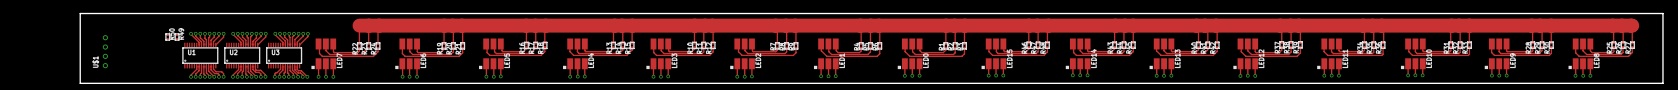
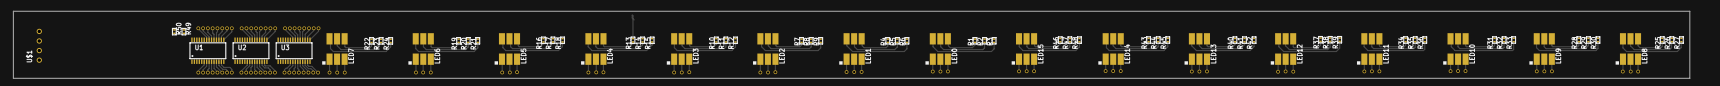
board edge: (80, 13) (80, 83) (1662, 83) (1662, 13) (80, 13) -> (13, 11) (13, 78) (1689, 78) (1689, 11) (13, 11)
track: (368, 25) (368, 44) -> none
track: (379, 25) (378, 44) -> none
track: (444, 25) (444, 44) -> none
track: (452, 25) (453, 44) -> none
track: (461, 25) (462, 44) -> none
track: (526, 25) (526, 43) -> none
track: (535, 25) (535, 43) -> none
track: (545, 25) (545, 43) -> none
track: (622, 25) (622, 43) -> none
track: (632, 25) (632, 43) -> none
track: (694, 25) (694, 43) -> none
track: (704, 25) (703, 43) -> none
track: (712, 25) (713, 43) -> none
track: (775, 25) (777, 44) -> none
track: (785, 25) (786, 44) -> none
track: (795, 25) (795, 44) -> none
track: (860, 25) (861, 44) -> none
track: (870, 25) (870, 44) -> none
track: (879, 25) (879, 44) -> none
track: (946, 25) (945, 44) -> none
track: (954, 25) (955, 44) -> none
track: (964, 25) (964, 44) -> none
track: (1028, 25) (1028, 43) -> none
track: (1037, 25) (1038, 43) -> none
track: (1048, 25) (1047, 43) -> none
track: (1115, 25) (1113, 23) (1113, 22) (1114, 23) (1114, 43) -> none
track: (1124, 25) (1123, 43) -> none
track: (1133, 25) (1133, 43) -> none
track: (1196, 25) (1198, 27) (1198, 43) -> none
track: (1204, 25) (1207, 28) (1207, 43) -> none
track: (1216, 25) (1217, 43) -> none
track: (1280, 25) (1281, 43) -> none
track: (1290, 25) (1291, 43) -> none
track: (1298, 25) (1300, 43) -> none
track: (1363, 25) (1364, 43) -> none
track: (1372, 25) (1373, 43) -> none
track: (1381, 25) (1383, 27) (1383, 43) -> none
track: (1451, 25) (1450, 43) -> none
track: (1459, 25) (1460, 43) -> none
track: (1469, 25) (1469, 43) -> none
track: (1531, 25) (1532, 43) -> none
track: (1540, 25) (1542, 27) (1542, 43) -> none
track: (1551, 25) (1551, 43) -> none
track: (1612, 25) (1613, 43) -> none
track: (1622, 25) (1623, 43) -> none
track: (1631, 25) (1632, 43) -> none
track: (1632, 25) (359, 25) (359, 44) -> none
part position: (105, 51) -> (39, 45)

